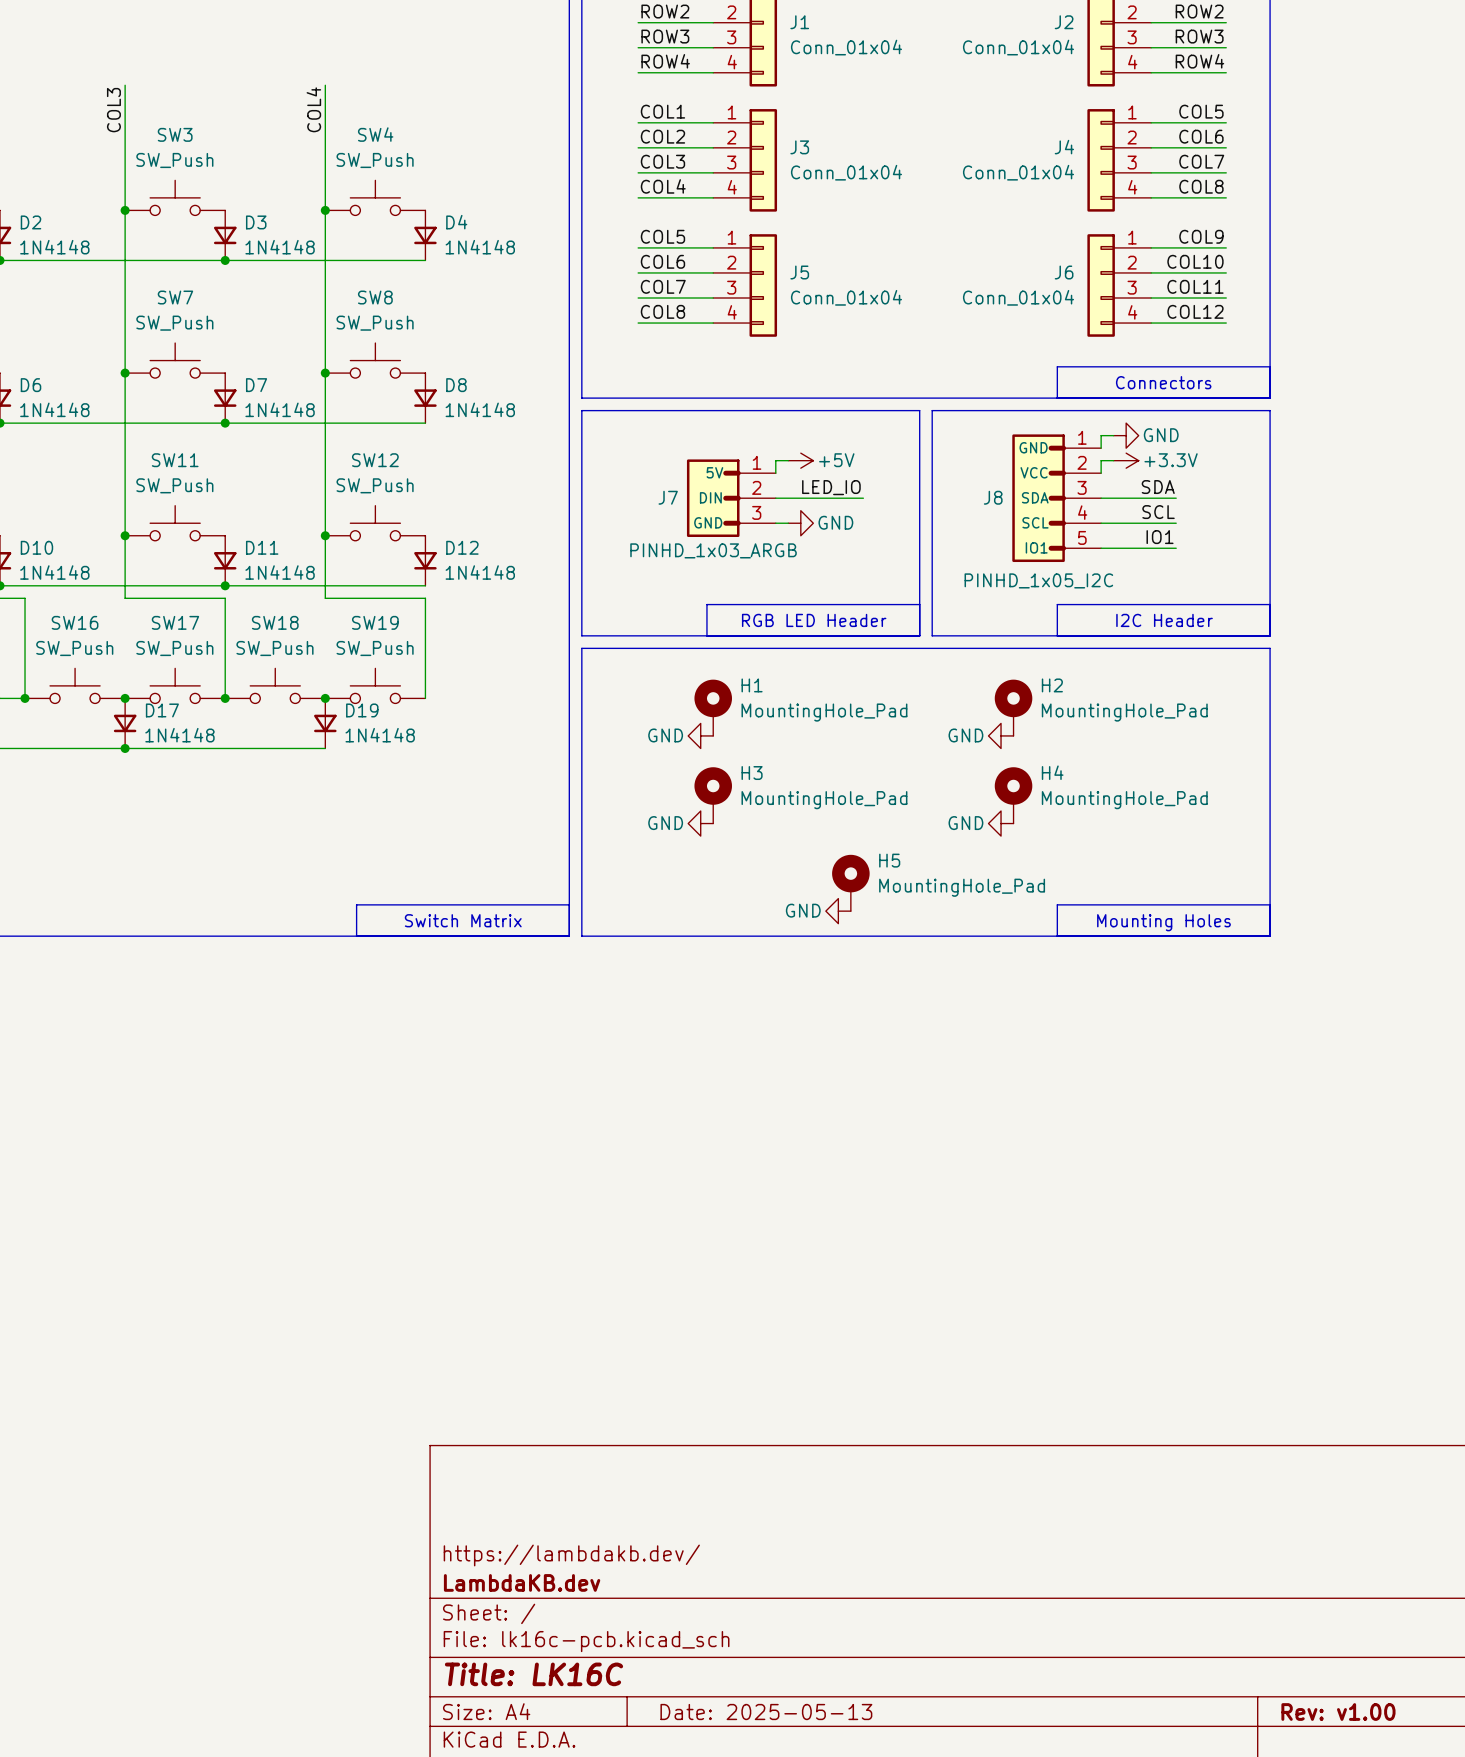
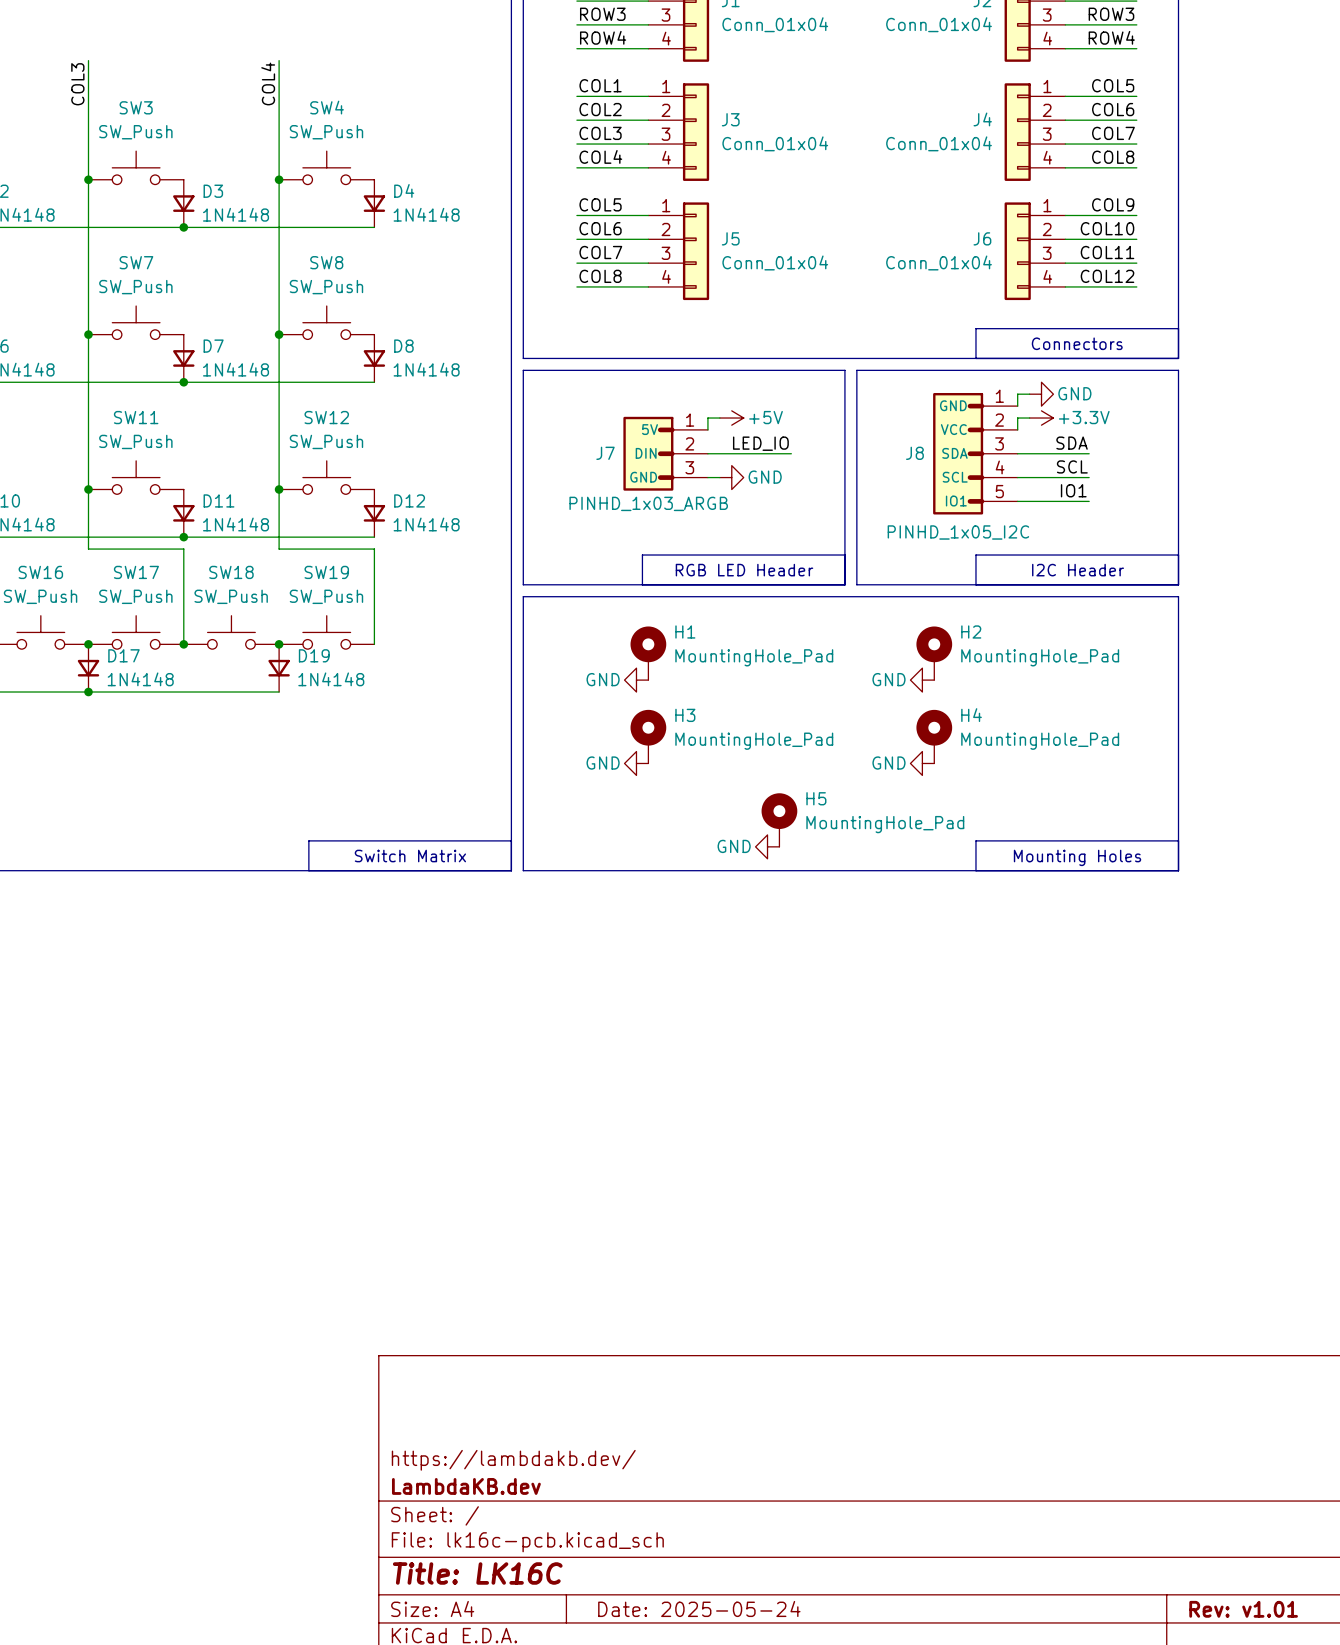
title block: Date: 2025-05-13 (766, 1712) -> Date: 2025-05-24 (699, 1608)
title block: Rev: v1.00 (1338, 1712) -> Rev: v1.01 (1243, 1609)

